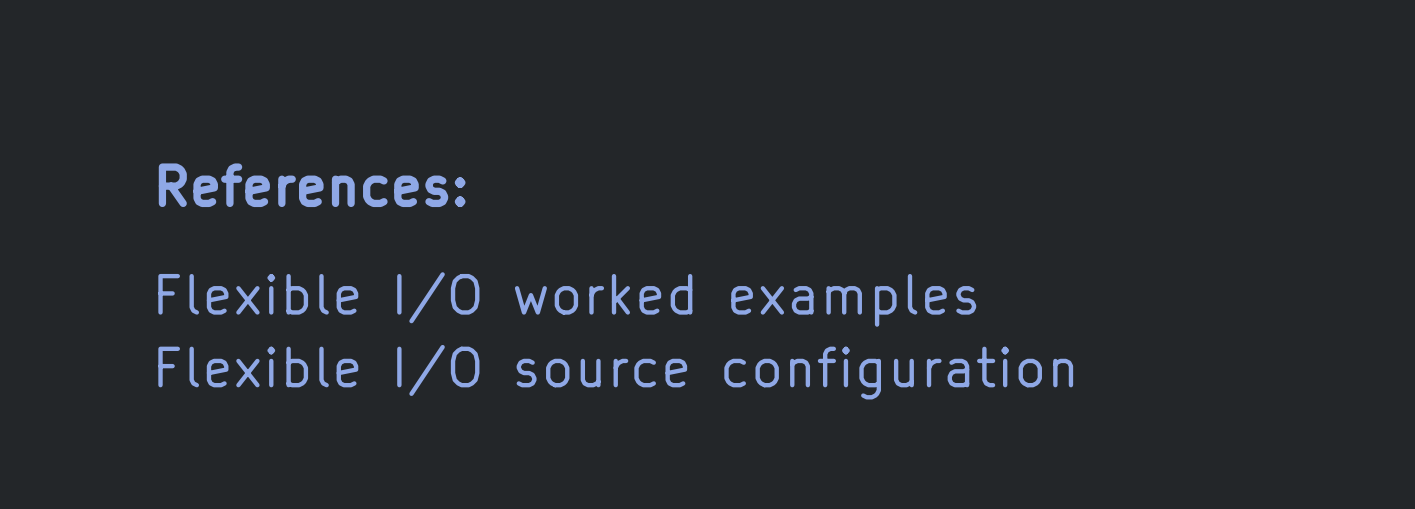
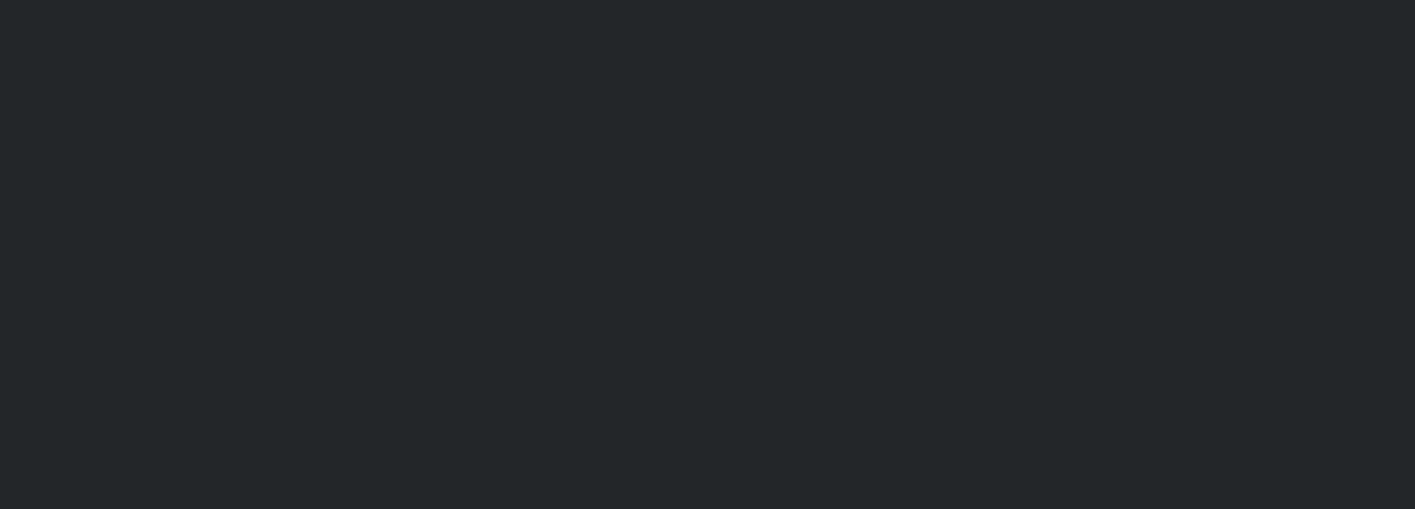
text: References: (312, 185) -> none
text: Flexible I/O worked examples (567, 299) -> none
text: Flexible I/O source configuration (615, 372) -> none

